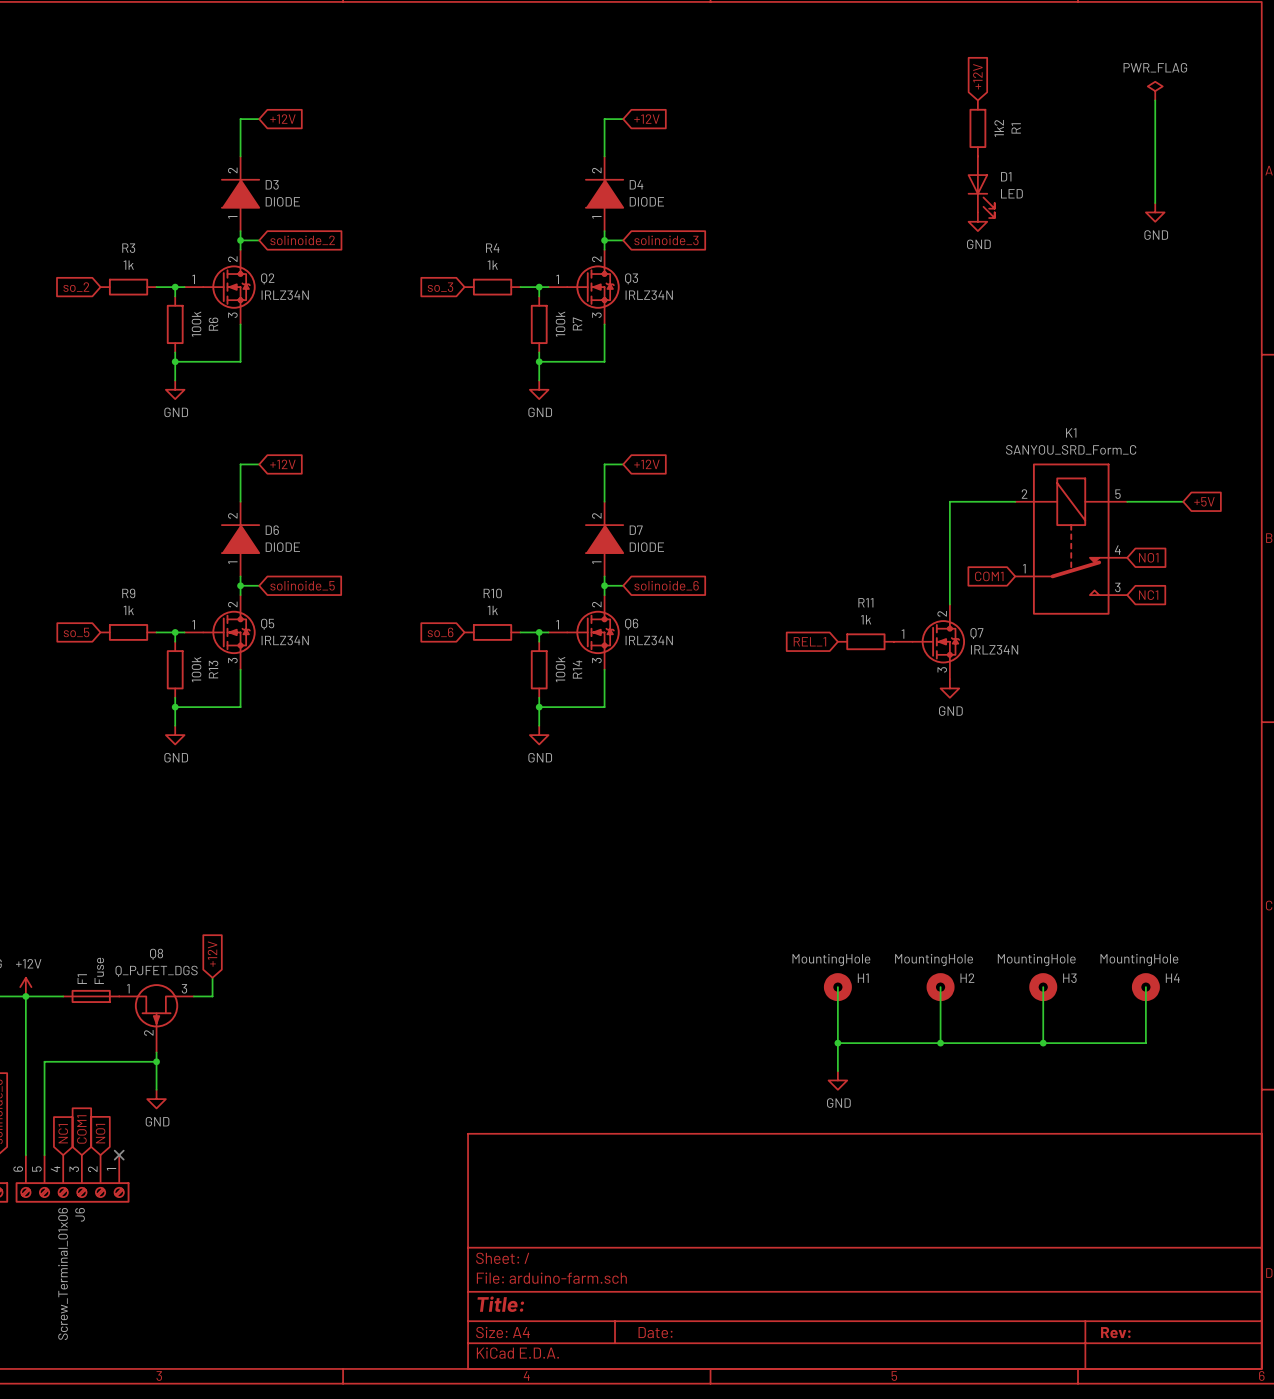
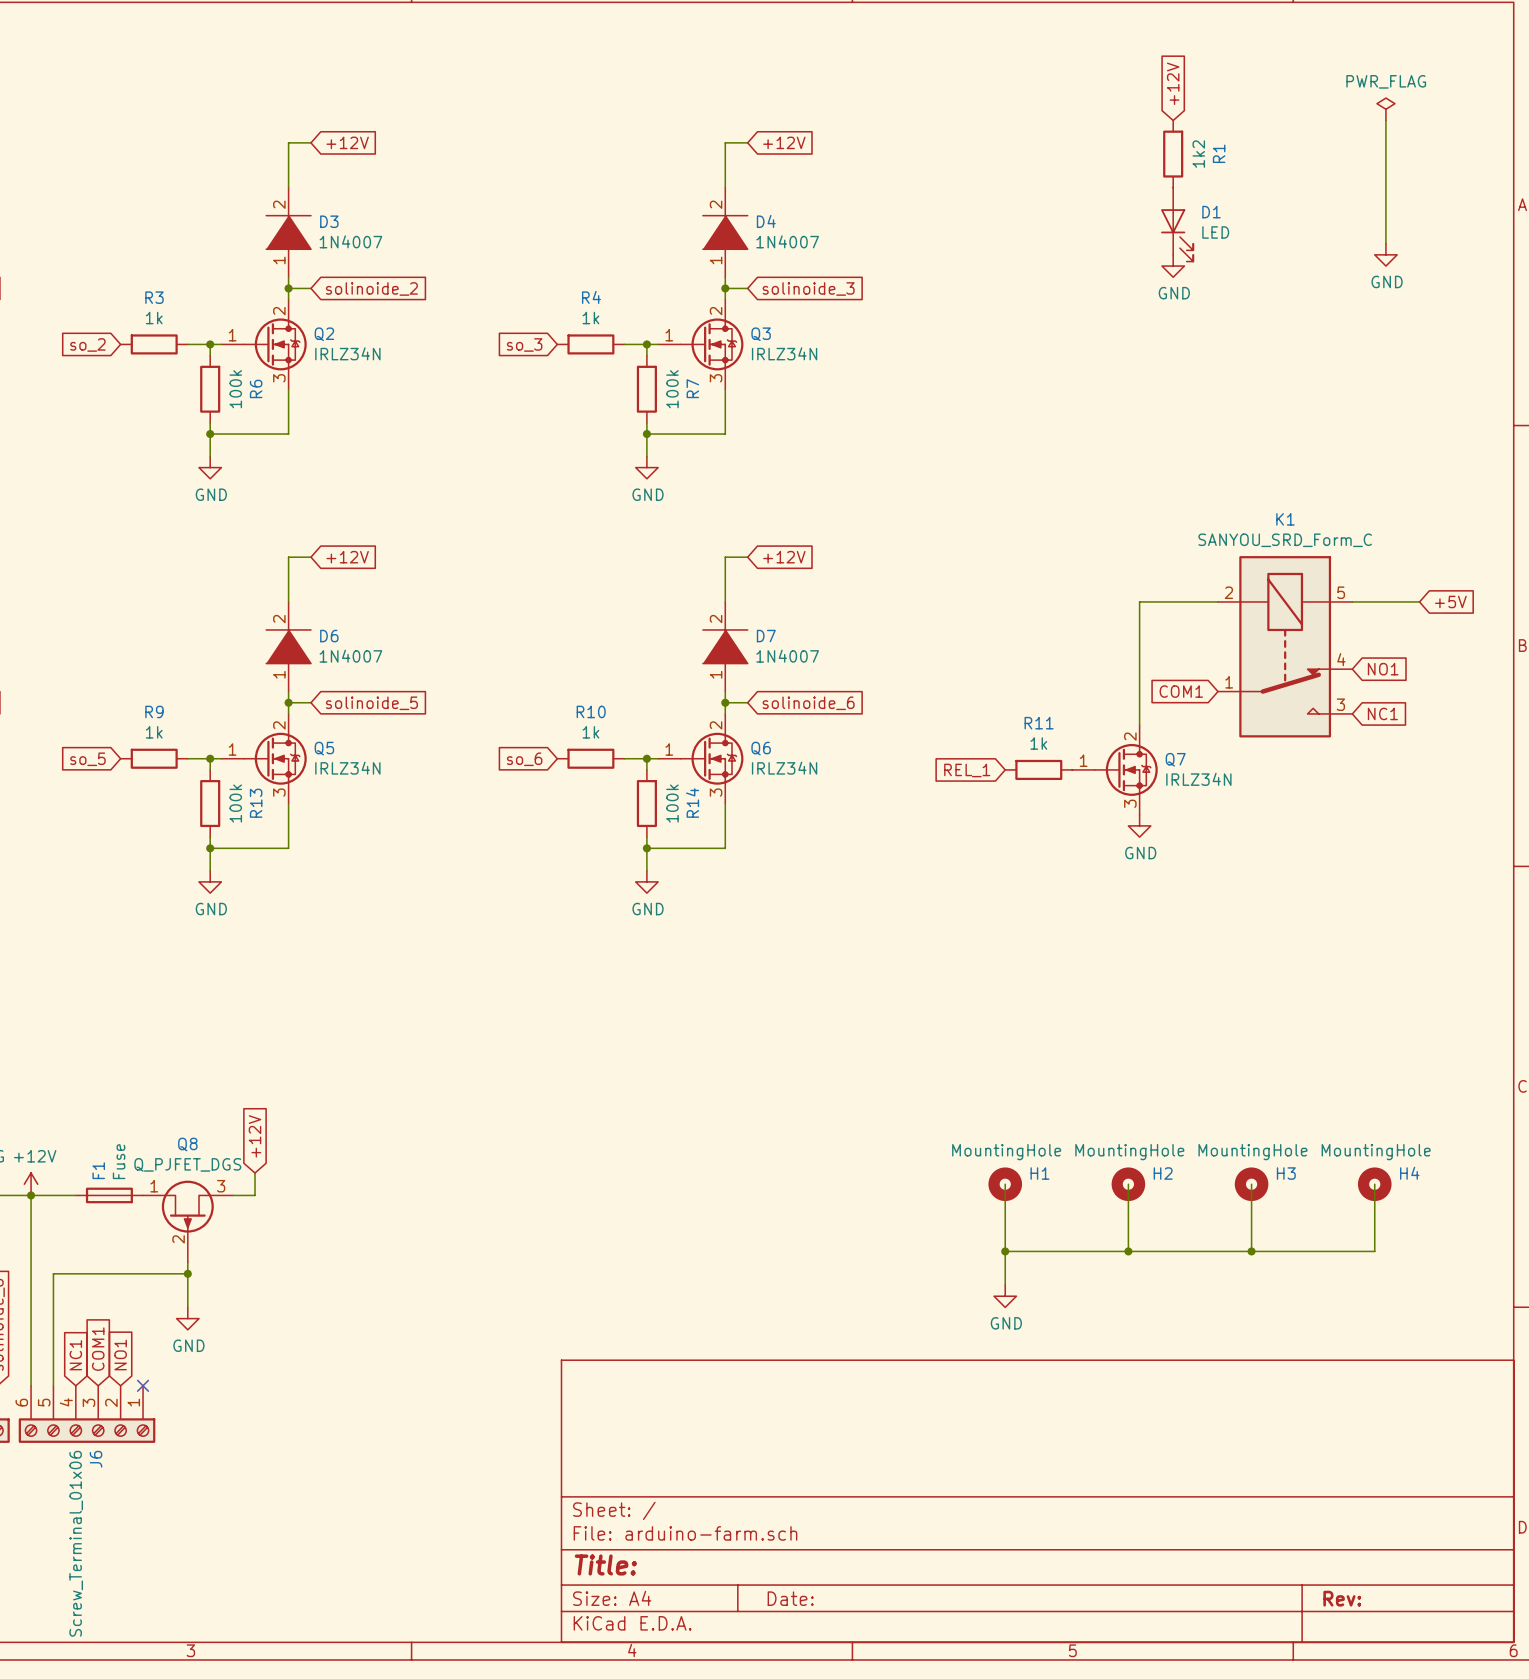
D3 value: DIODE (282, 201) -> 1N4007 (350, 241)
D4 value: DIODE (646, 201) -> 1N4007 (787, 241)
D6 value: DIODE (282, 547) -> 1N4007 (350, 656)
D7 value: DIODE (646, 547) -> 1N4007 (787, 656)

